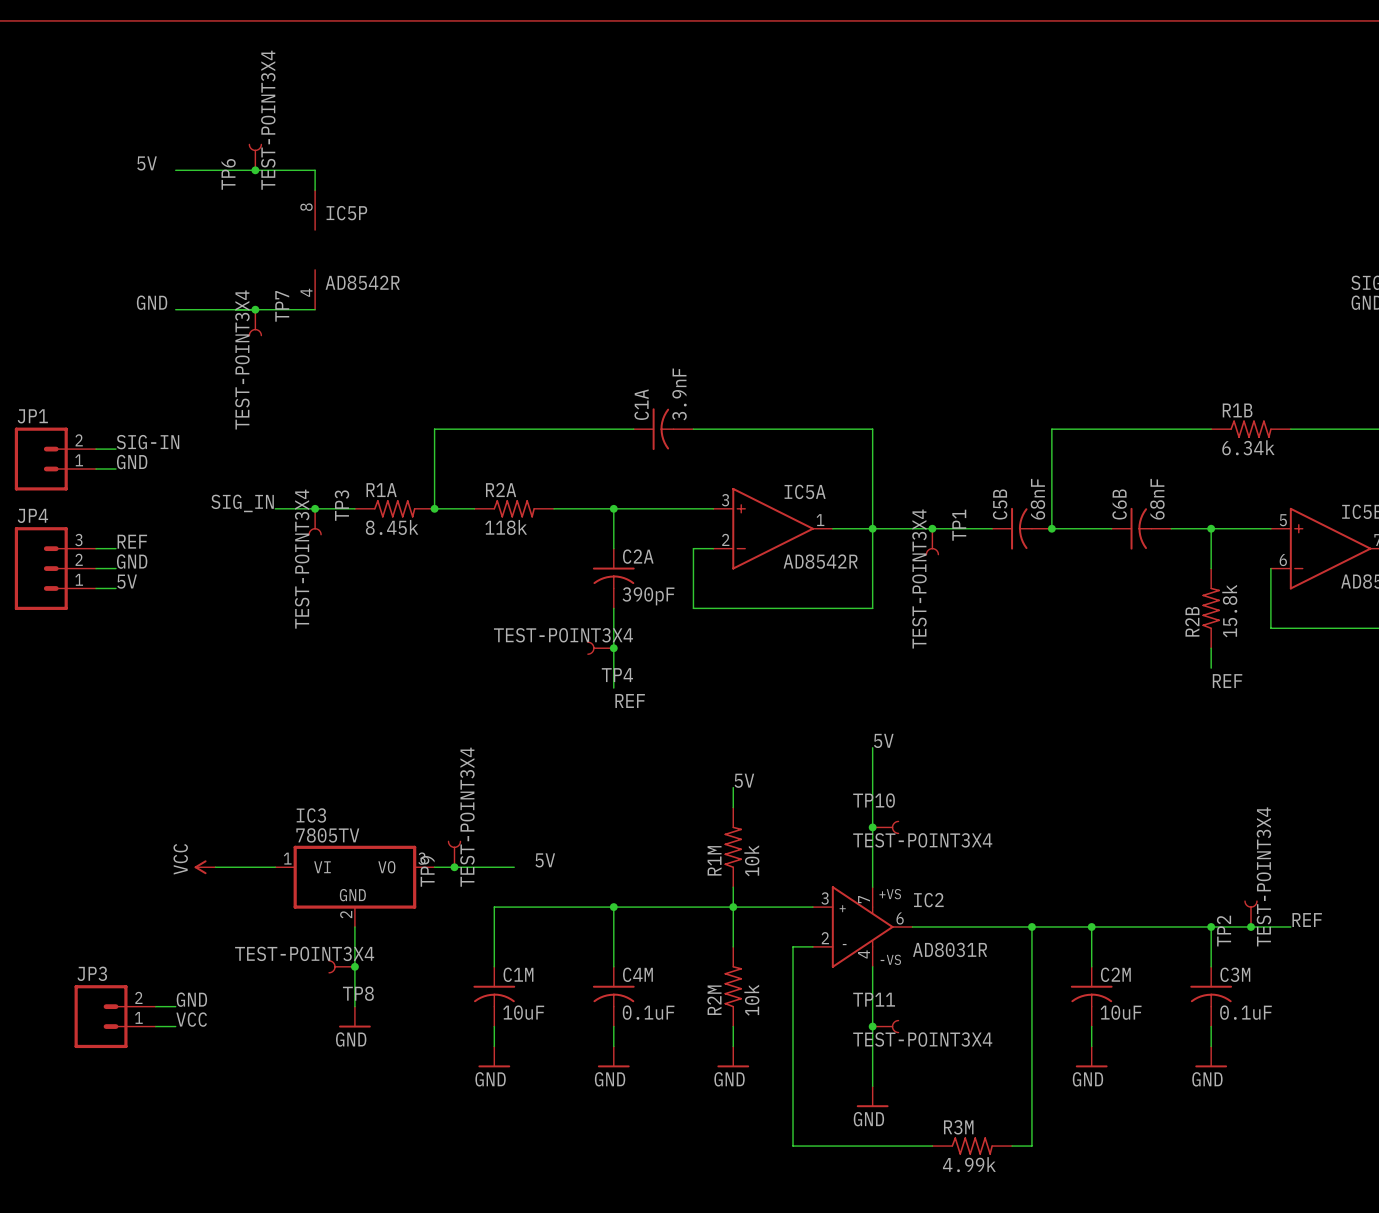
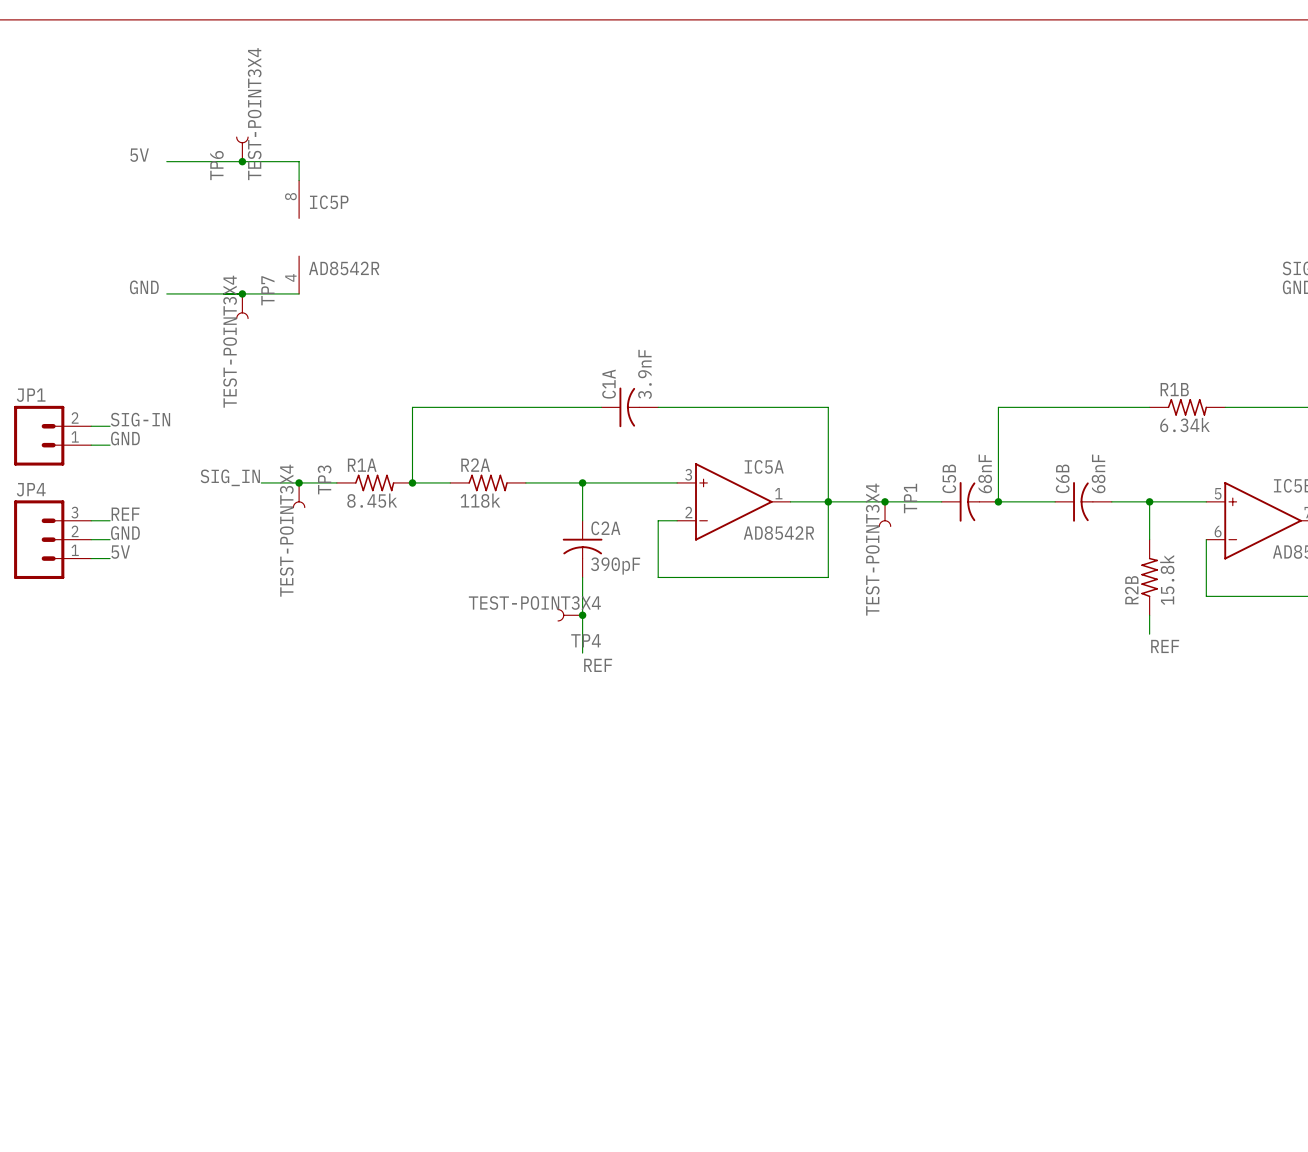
label: 5V (883, 740) -> none
wire: (872, 747) (872, 887) -> none
label: 5V (744, 780) -> none
wire: (733, 787) (733, 807) -> none
junction: (872, 827) -> none
TP10: TEST-POINT3X4 (885, 827) -> none
R1M: 10k (733, 847) -> none
TP9: TEST-POINT3X4 (454, 854) -> none
label: 5V (545, 860) -> none
power symbol: VCC (205, 867) -> none
wire: (215, 867) (275, 867) -> none
wire: (434, 867) (514, 867) -> none
junction: (454, 867) -> none
IC3: 7805TV (354, 886) -> none
wire: (733, 887) (733, 946) -> none
wire: (613, 907) (613, 966) -> none
junction: (613, 907) -> none
junction: (733, 907) -> none
wire: (812, 907) (494, 907) (494, 966) -> none
TP2: TEST-POINT3X4 (1251, 914) -> none
label: REF (1307, 920) -> none
wire: (354, 926) (354, 1006) -> none
IC2: AD8031R (862, 926) -> none
wire: (912, 926) (1290, 926) -> none
wire: (1031, 926) (1031, 1146) (1012, 1146) -> none
junction: (1031, 926) -> none
wire: (1091, 926) (1091, 966) -> none
junction: (1091, 926) -> none
wire: (1211, 926) (1211, 966) -> none
junction: (1211, 926) -> none
junction: (1251, 926) -> none
wire: (812, 946) (793, 946) (793, 1146) (932, 1146) -> none
TP8: TEST-POINT3X4 (341, 966) -> none
junction: (354, 966) -> none
wire: (872, 966) (872, 1086) -> none
R2M: 10k (733, 986) -> none
C1M: 10uF (494, 996) -> none
C4M: 0.1uF (613, 996) -> none
C2M: 10uF (1091, 996) -> none
C3M: 0.1uF (1211, 996) -> none
label: GND (191, 999) -> none
wire: (155, 1006) (175, 1006) -> none
JP3: (115, 1016) -> none
power symbol: GND (354, 1017) -> none
label: VCC (191, 1019) -> none
wire: (155, 1026) (175, 1026) -> none
wire: (494, 1026) (494, 1046) -> none
wire: (613, 1026) (613, 1046) -> none
wire: (733, 1026) (733, 1046) -> none
junction: (872, 1026) -> none
TP11: TEST-POINT3X4 (885, 1026) -> none
wire: (1091, 1026) (1091, 1046) -> none
wire: (1211, 1026) (1211, 1046) -> none
power symbol: GND (494, 1056) -> none
power symbol: GND (613, 1056) -> none
power symbol: GND (733, 1056) -> none
power symbol: GND (1091, 1056) -> none
power symbol: GND (1211, 1056) -> none
power symbol: GND (872, 1096) -> none
R3M: 4.99k (972, 1146) -> none

